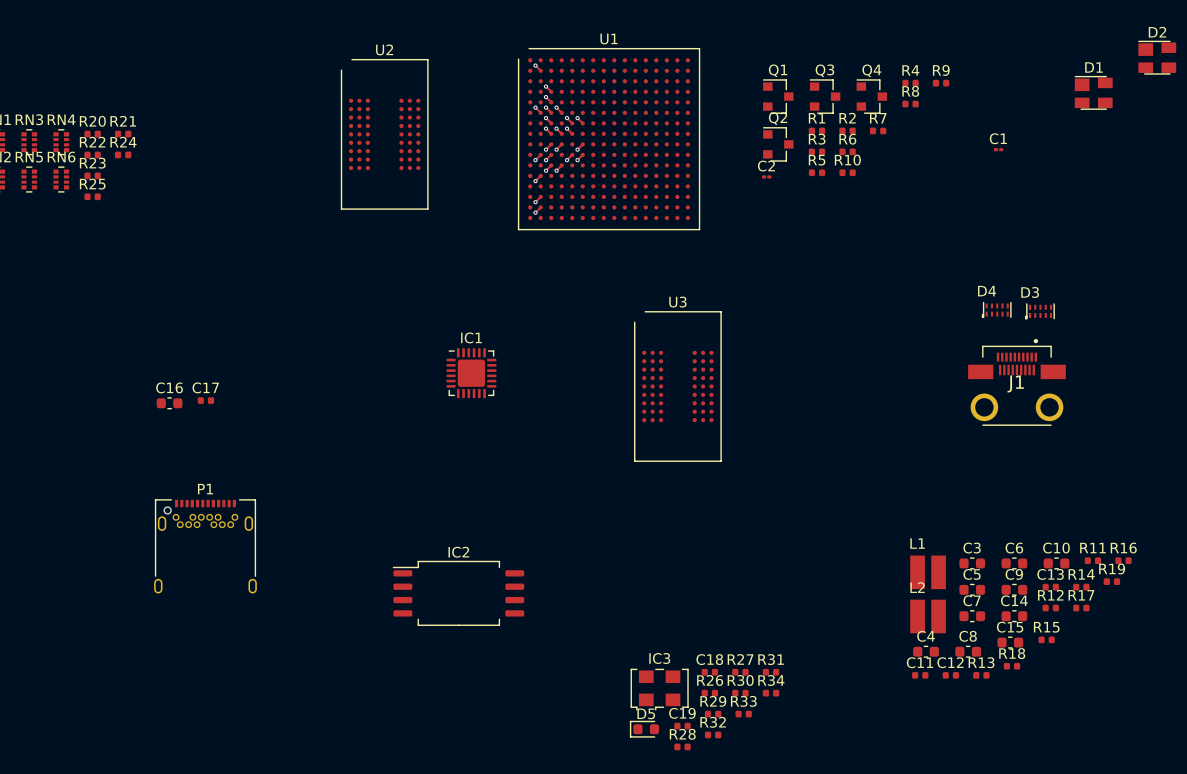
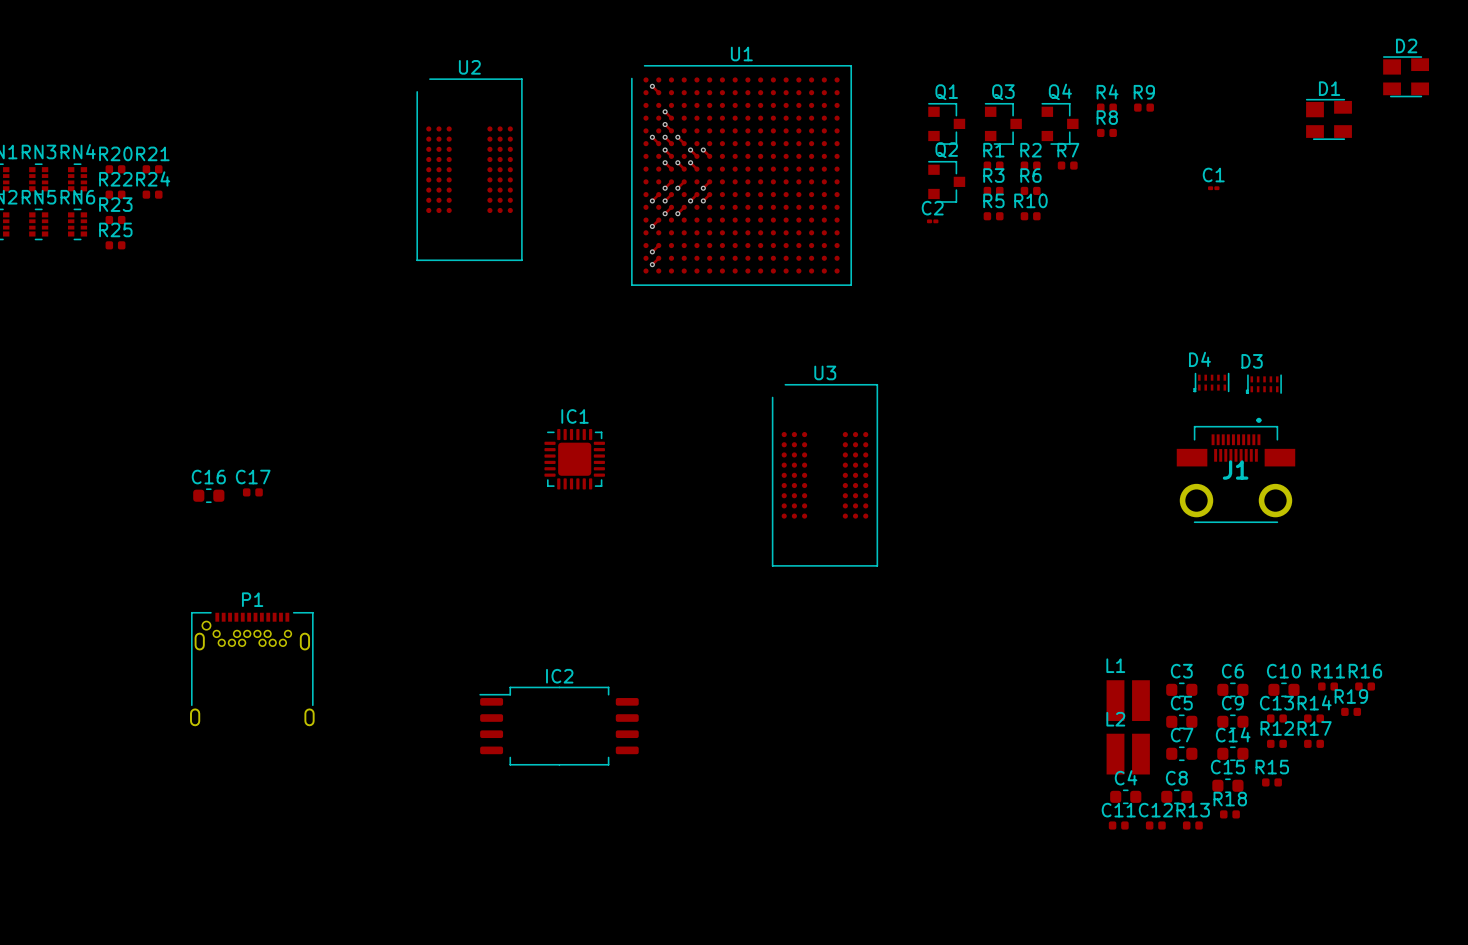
C18: (709, 672) -> none
R27: (740, 672) -> none
R31: (771, 672) -> none
IC3: (659, 689) -> none
R26: (709, 693) -> none
R30: (740, 693) -> none
R34: (771, 693) -> none
R29: (713, 714) -> none
R33: (743, 714) -> none
C19: (682, 726) -> none
D5: (644, 729) -> none
R32: (713, 734) -> none
R28: (682, 746) -> none

